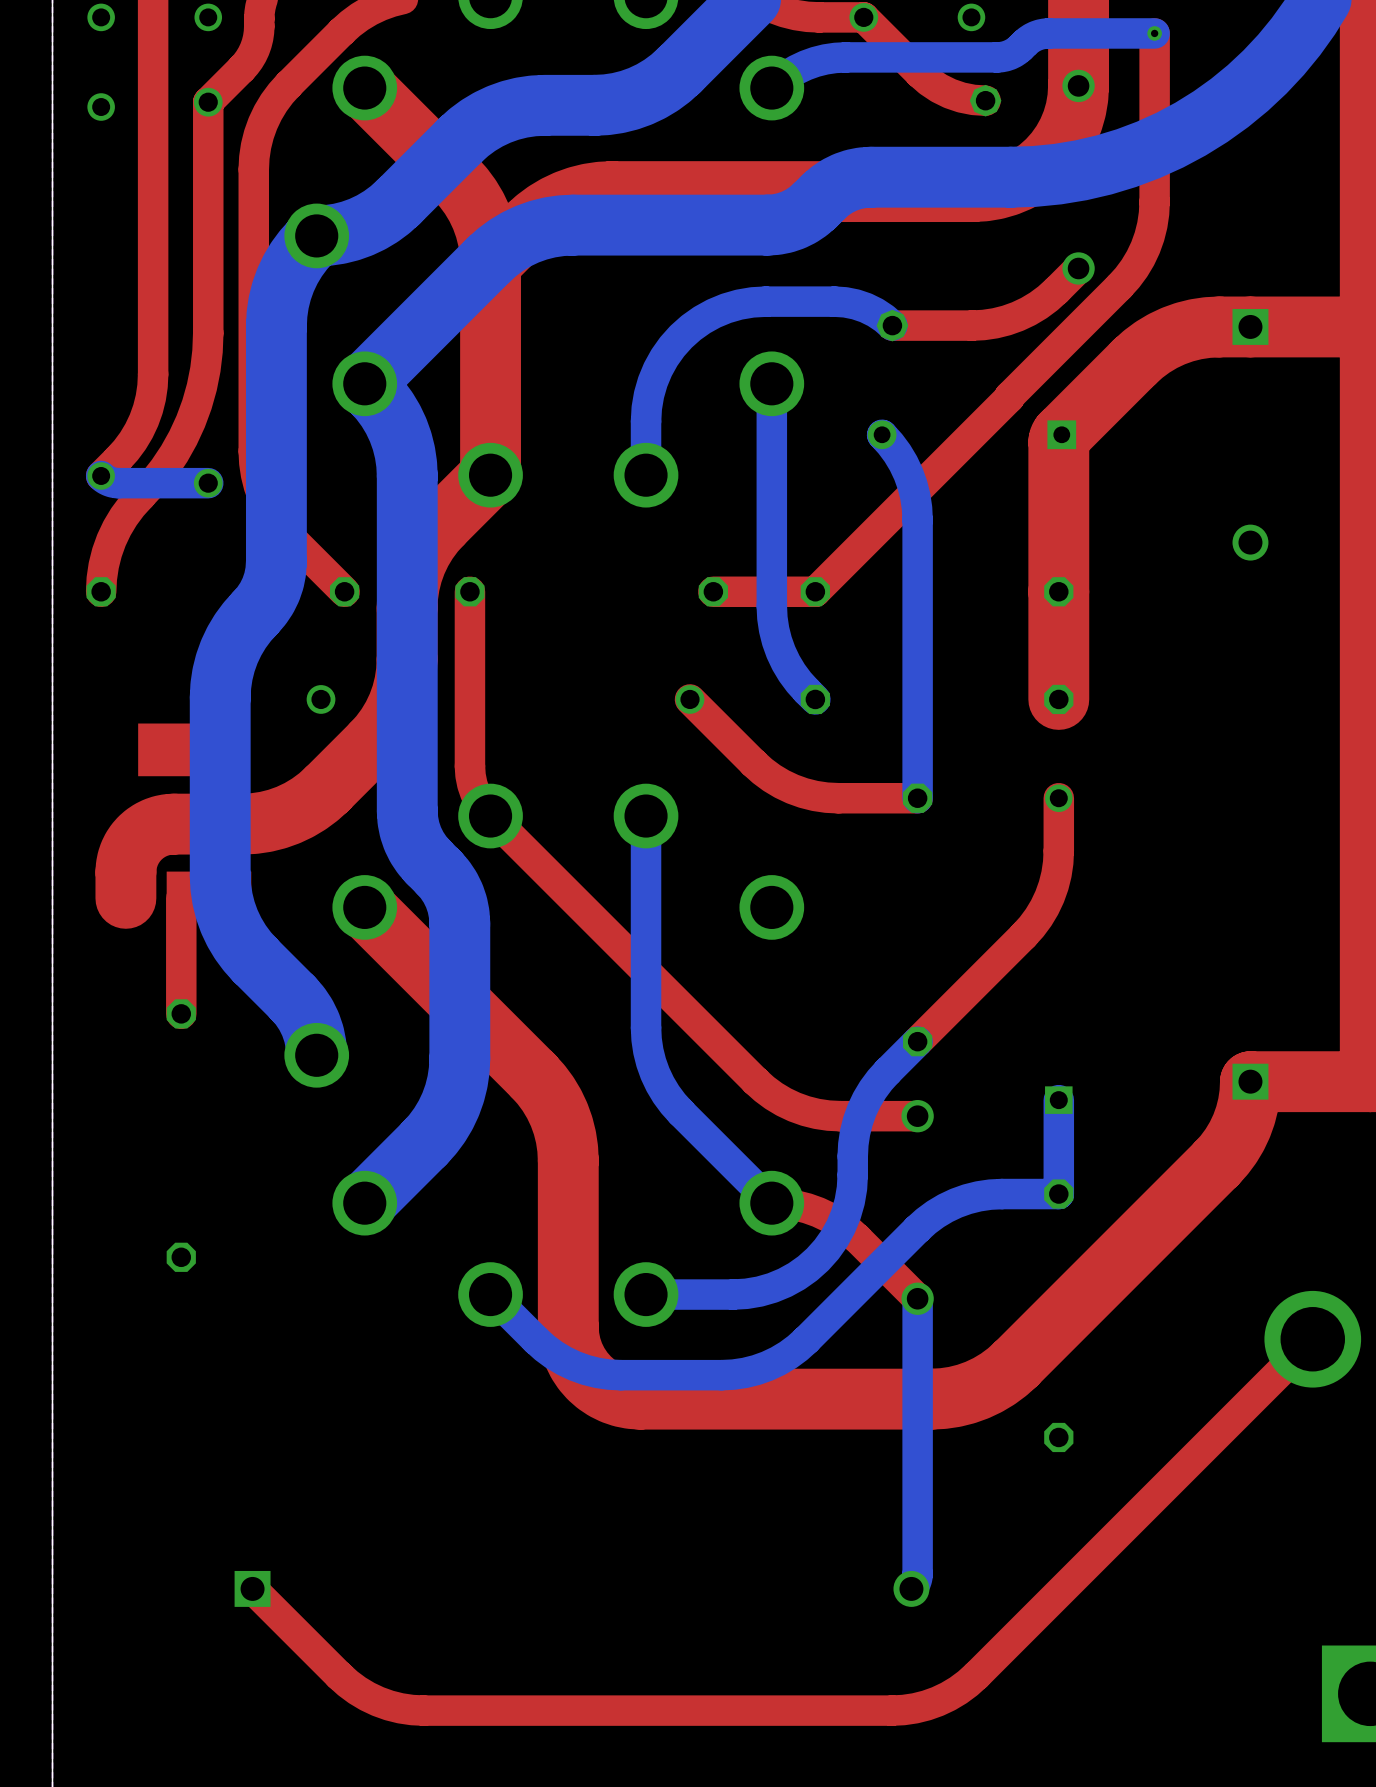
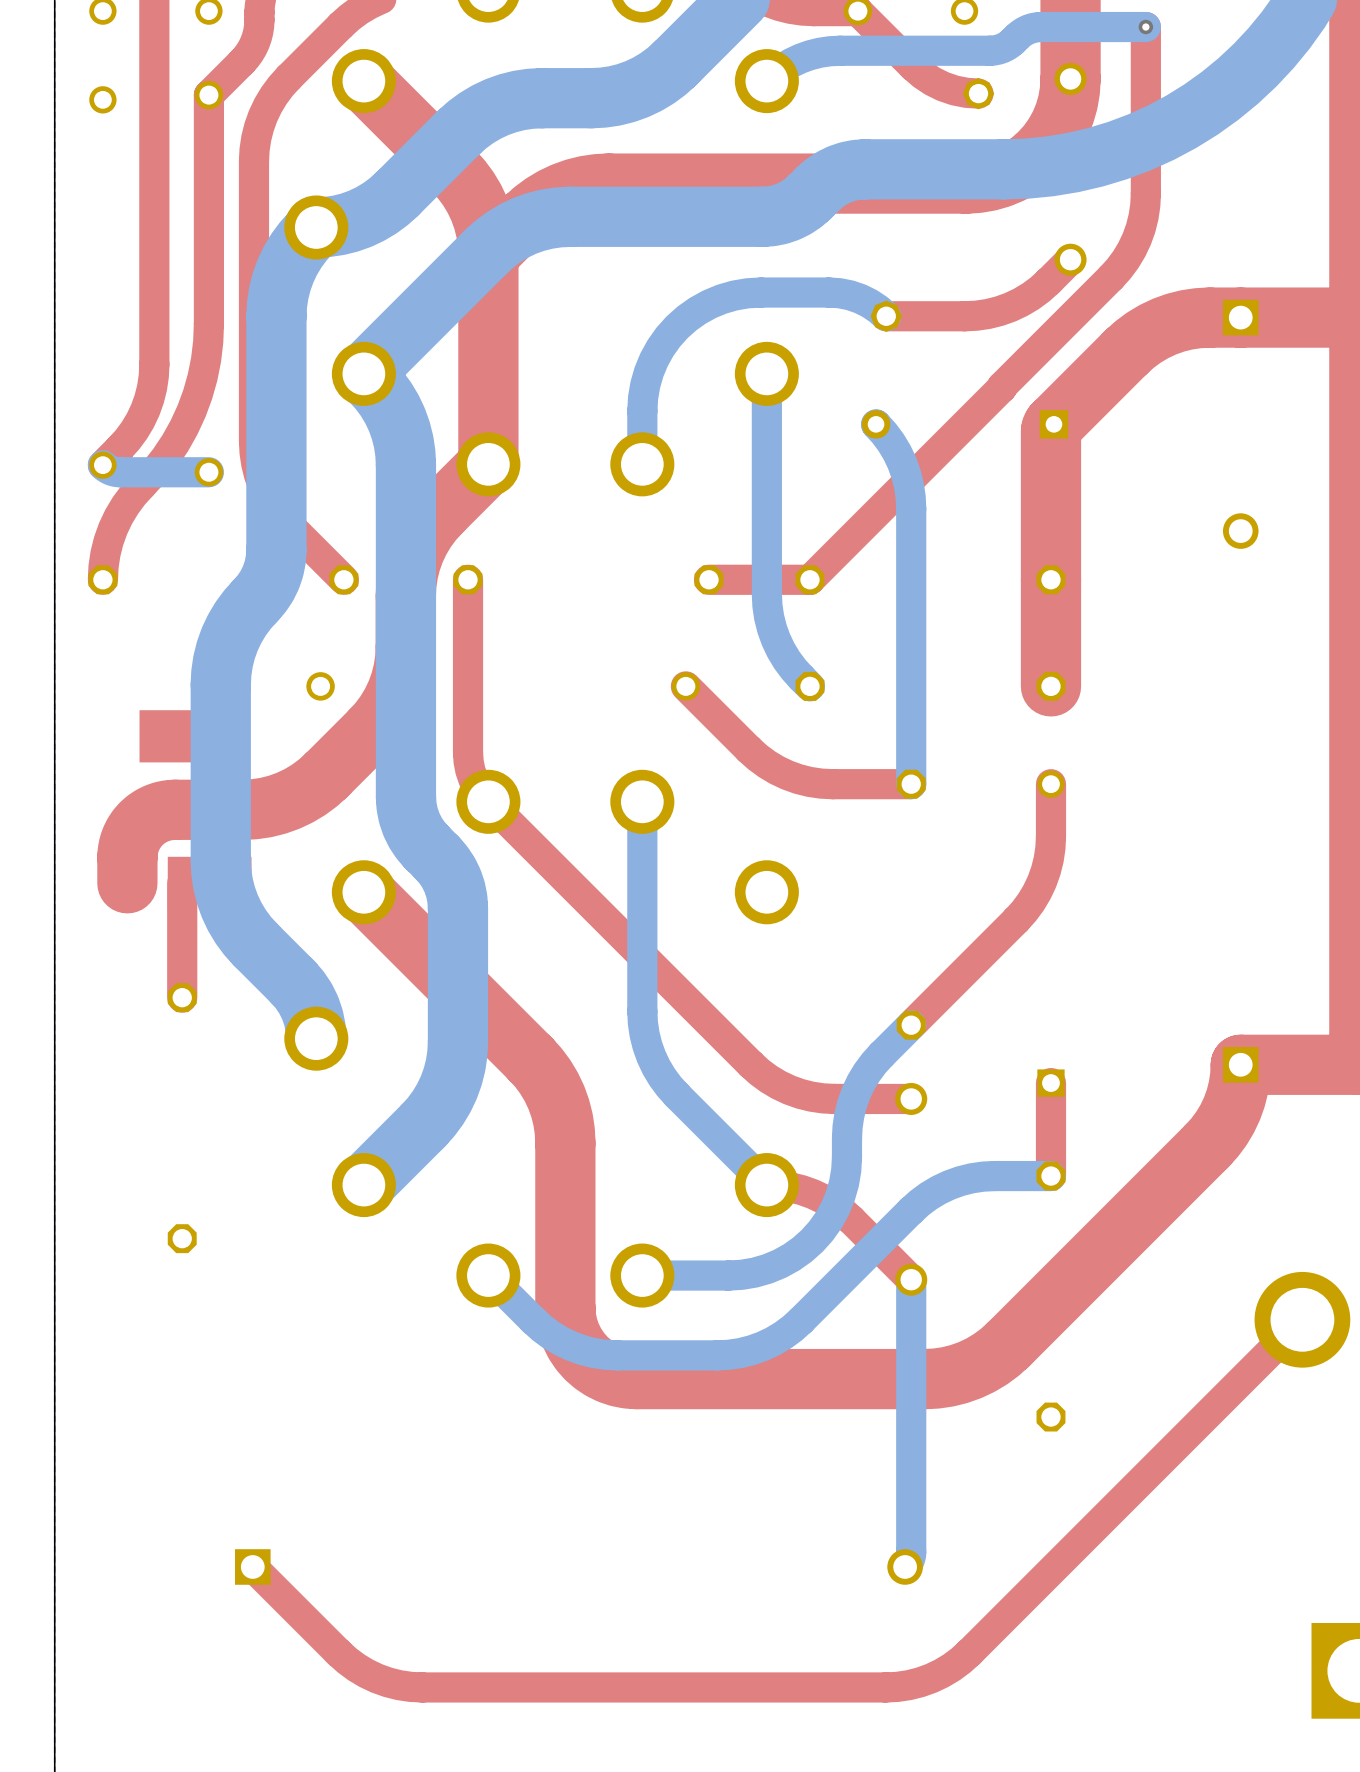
top track: none -> (1050, 1083) (1050, 1176)
bottom track: (1058, 1100) (1058, 1194) -> none

